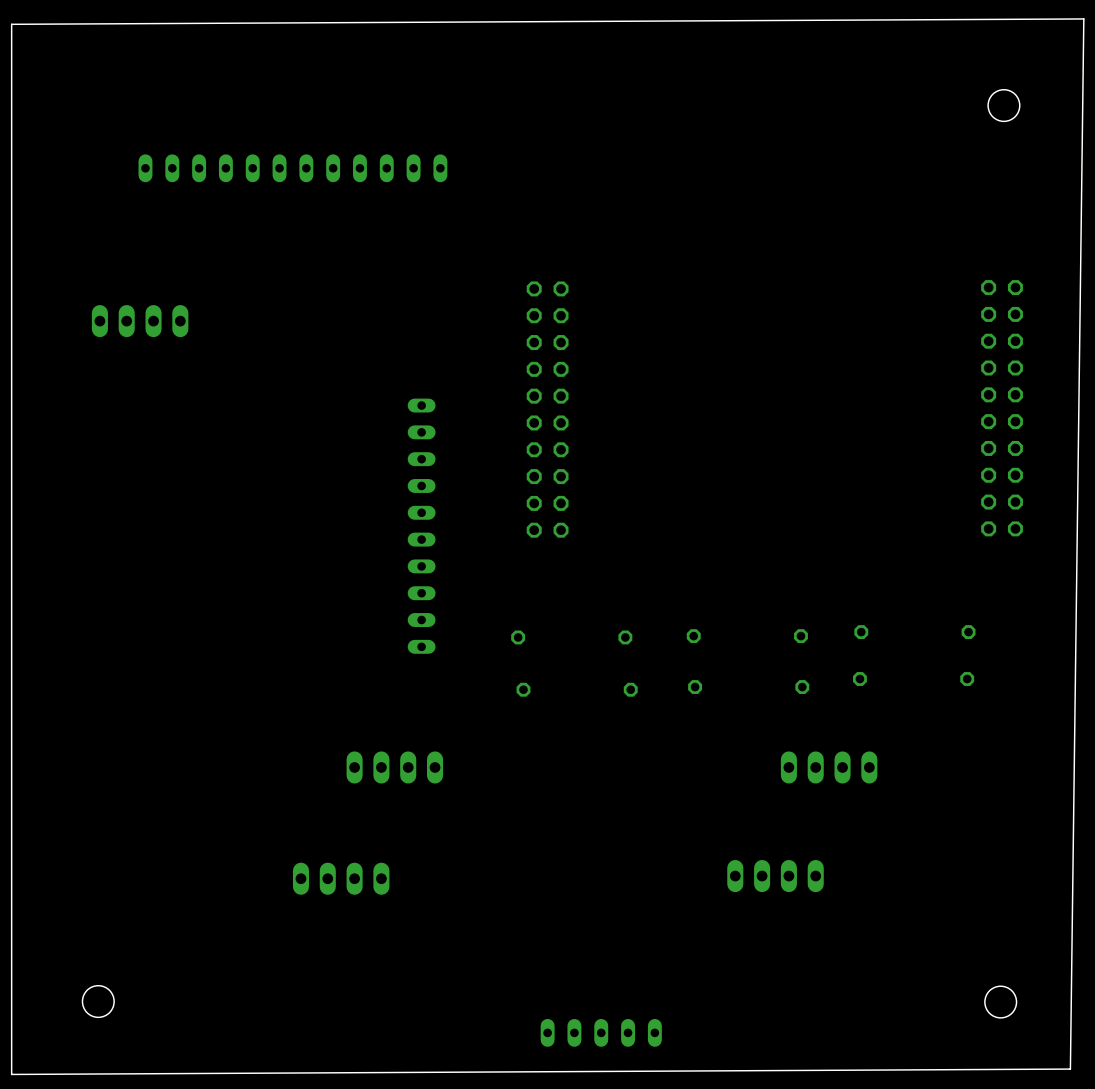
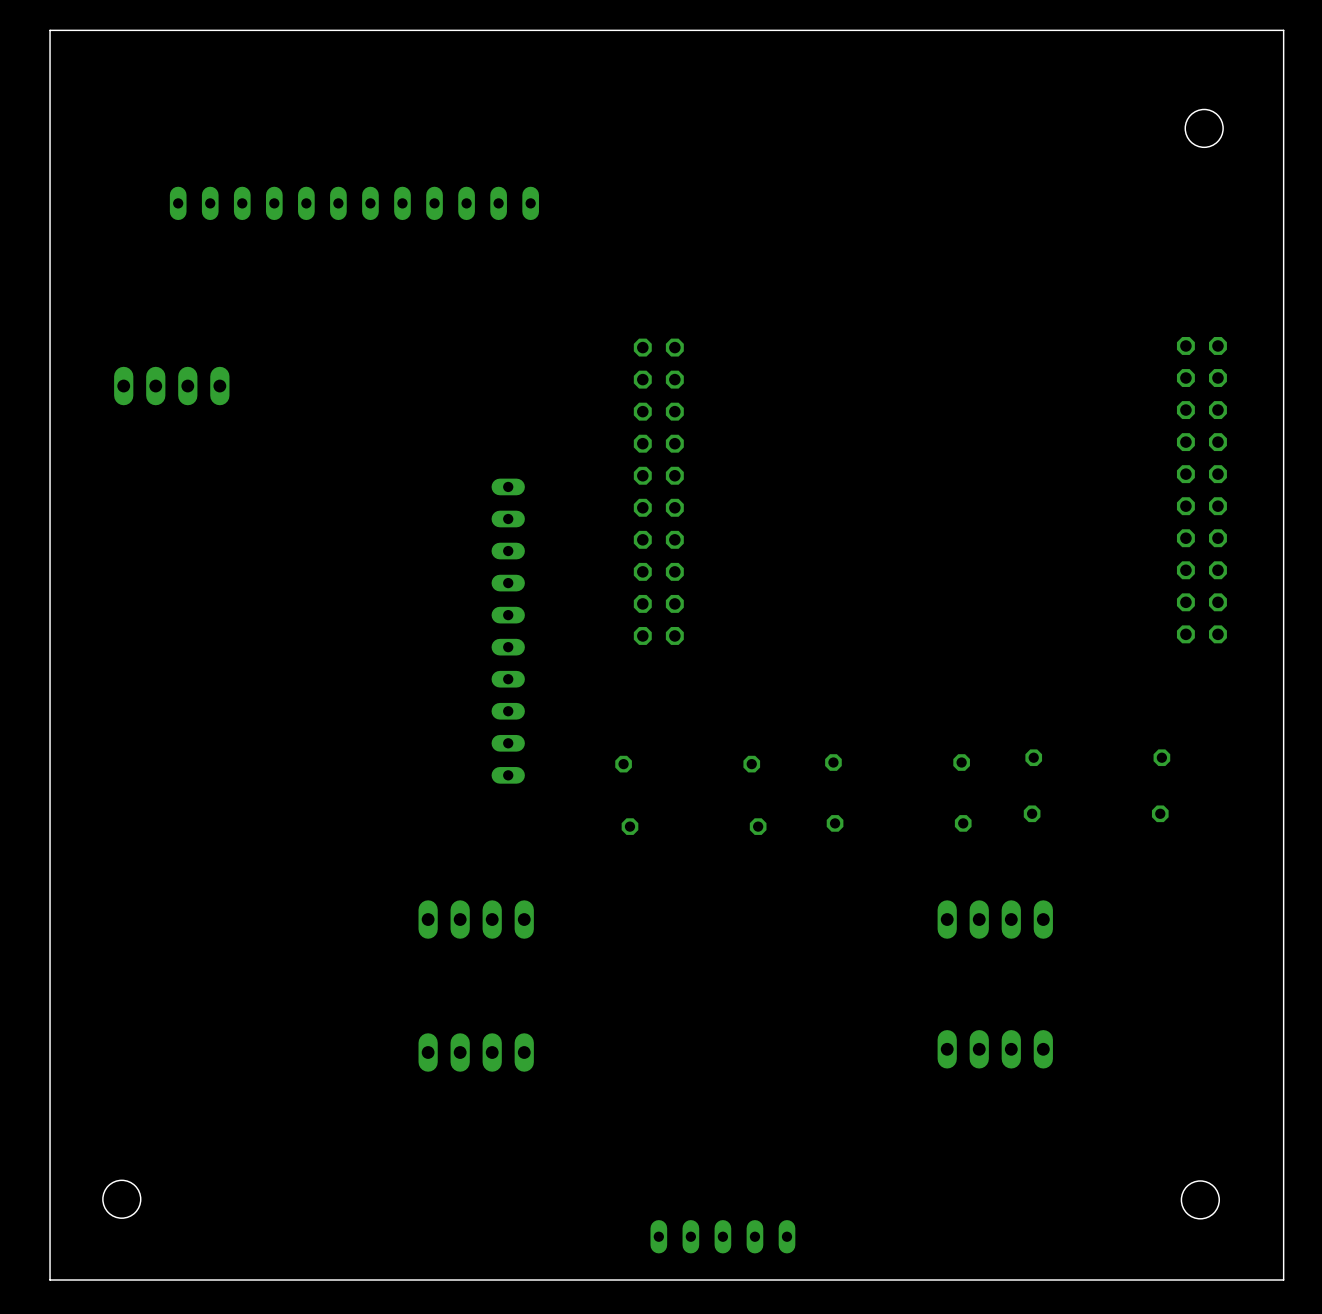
board edge: (1083, 18) (11, 24) (11, 1074) (1070, 1069) (1083, 18) -> (1283, 30) (1283, 1280) (50, 1280) (50, 30) (1283, 30)
part position: (775, 876) -> (995, 1049)
part position: (341, 878) -> (476, 1052)

